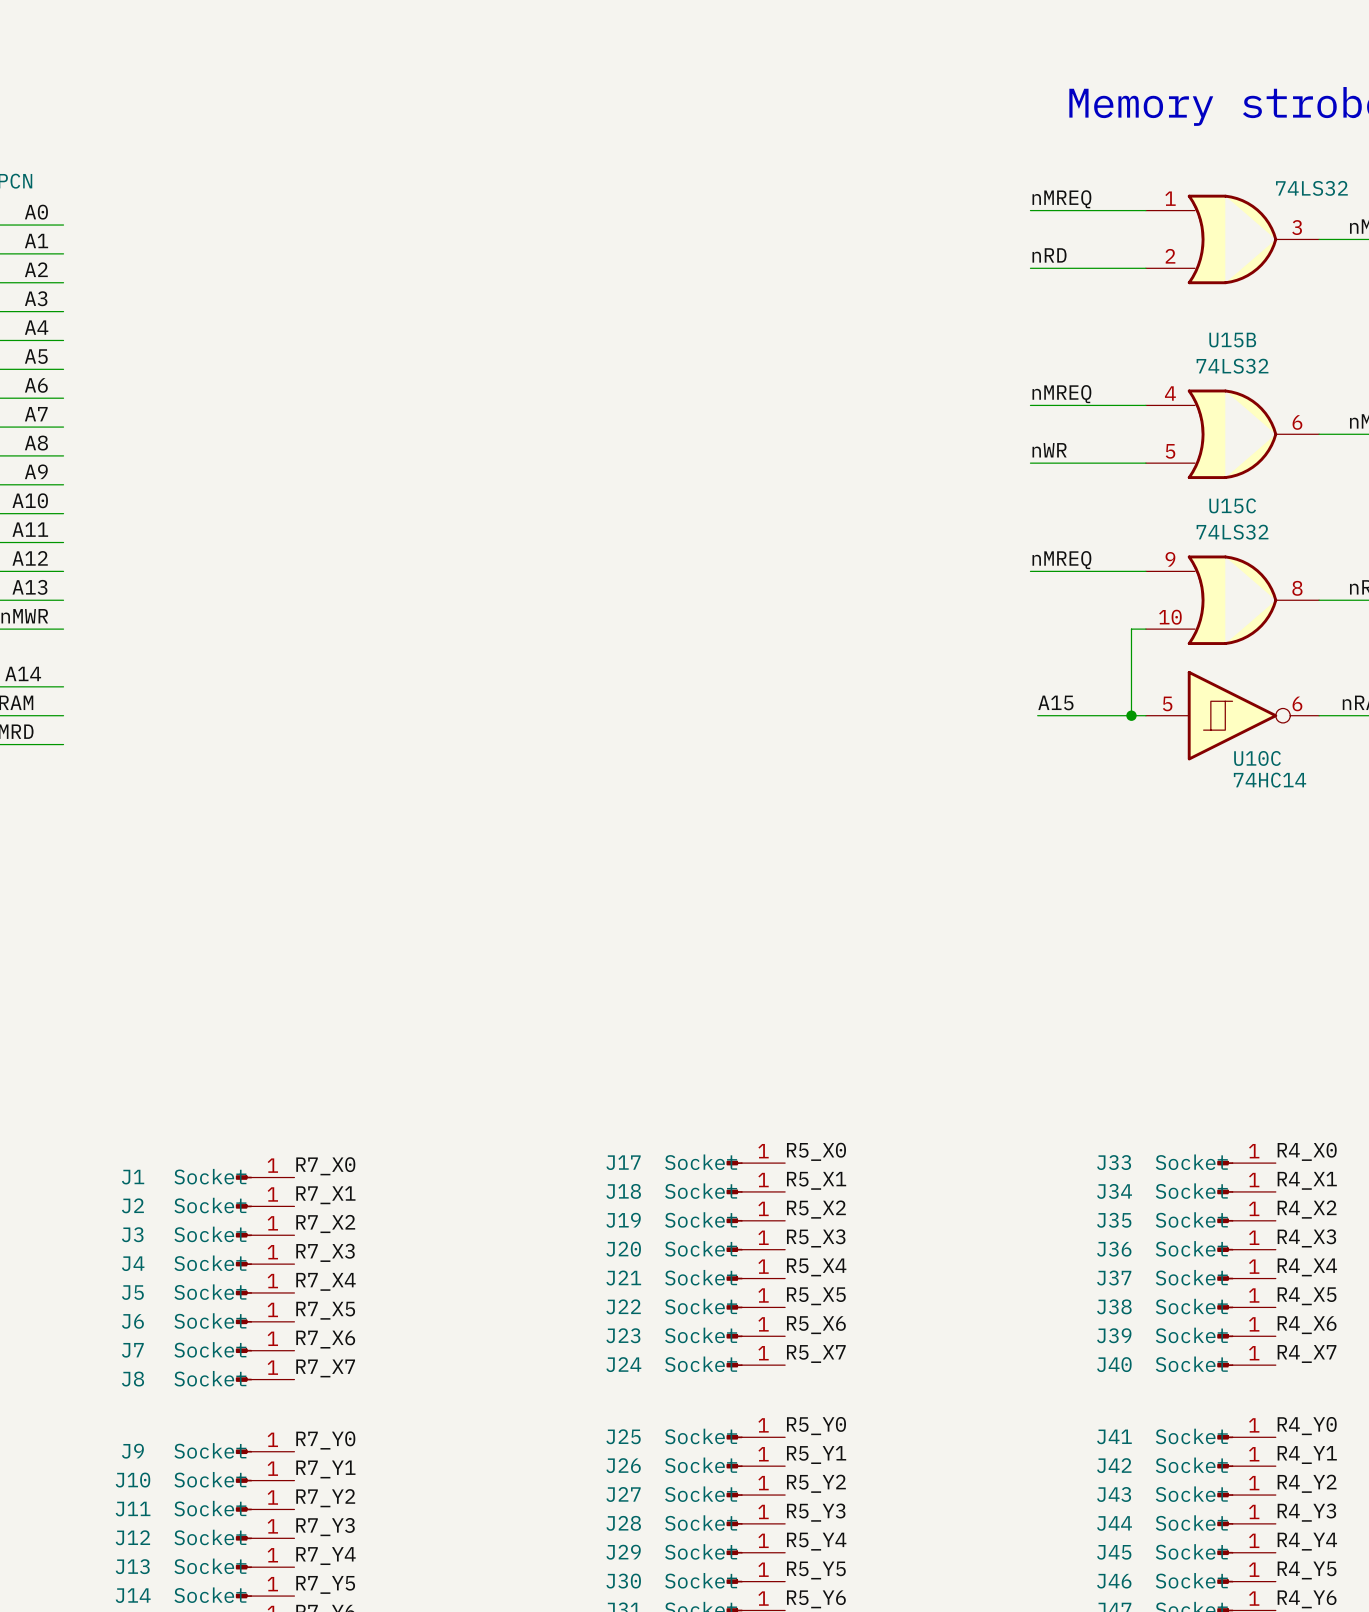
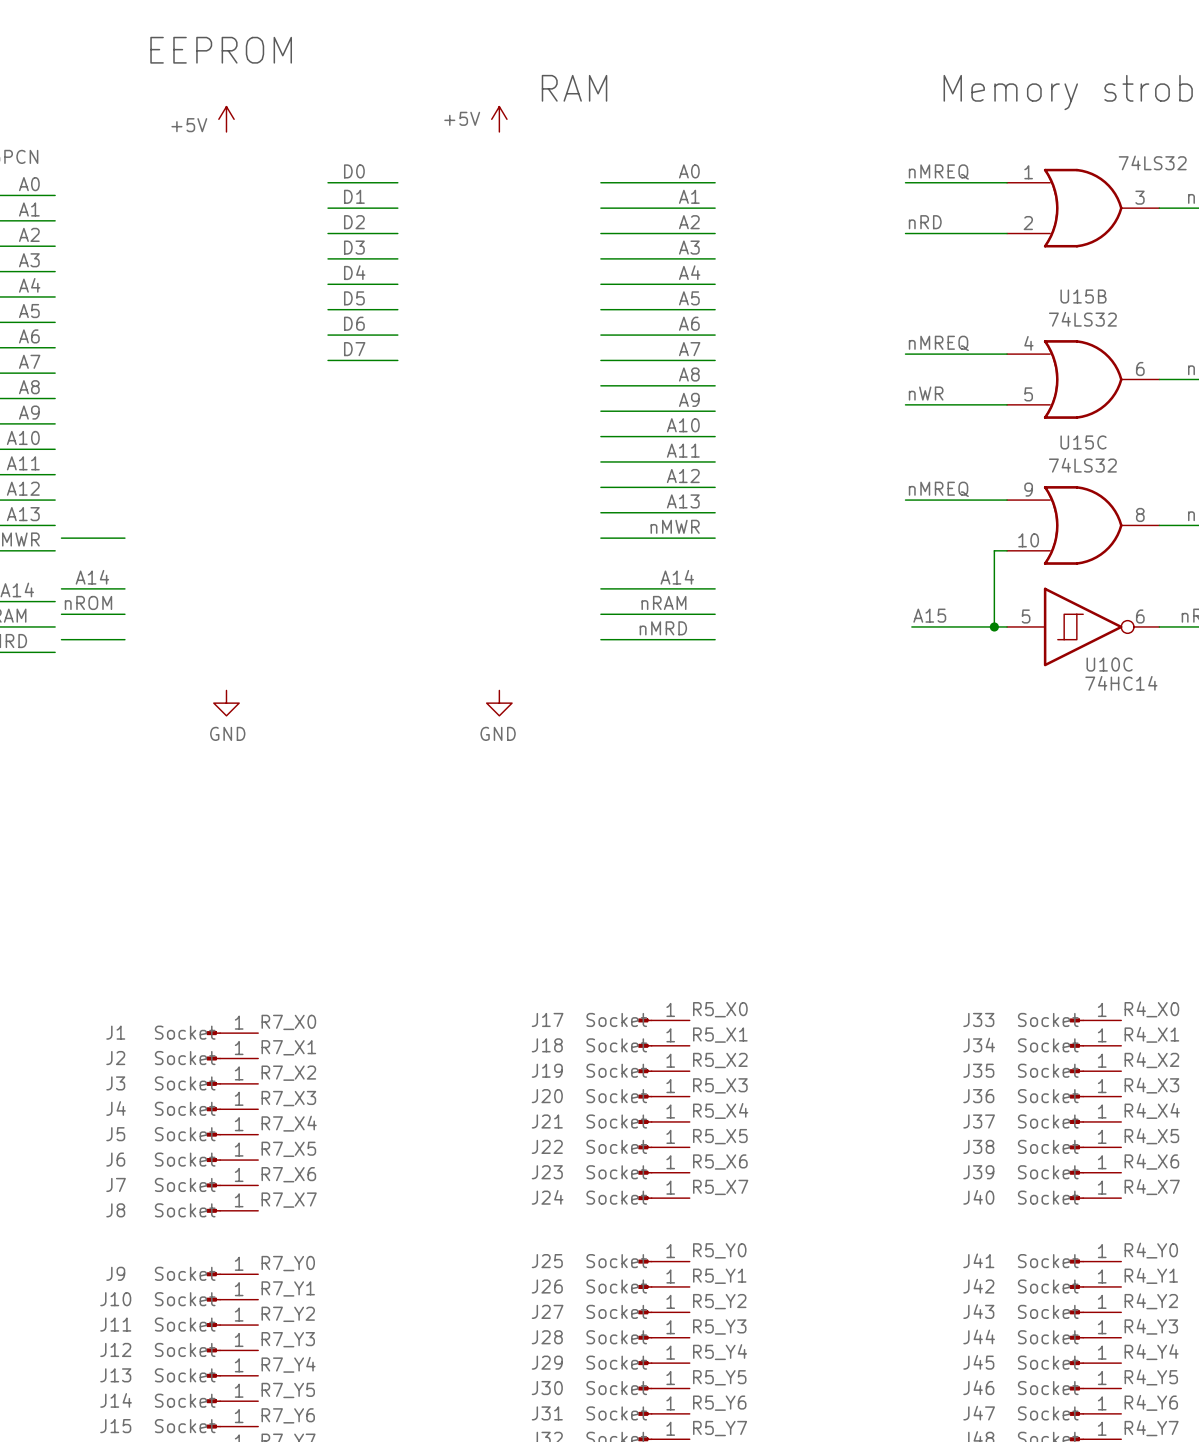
text: none -> EEPROM (221, 50)
text: none -> RAM (574, 88)
power symbol: none -> +5V (226, 119)
power symbol: none -> +5V (499, 119)
label: none -> D0 (354, 171)
label: none -> A0 (689, 171)
wire: none -> (328, 182) (397, 182)
wire: none -> (600, 182) (715, 182)
label: none -> D1 (354, 196)
label: none -> A1 (689, 196)
wire: none -> (328, 208) (397, 208)
wire: none -> (600, 208) (715, 208)
label: none -> D2 (354, 222)
label: none -> A2 (689, 222)
wire: none -> (328, 233) (397, 233)
wire: none -> (600, 233) (715, 233)
label: none -> D3 (354, 247)
label: none -> A3 (689, 247)
wire: none -> (328, 258) (397, 258)
wire: none -> (600, 258) (715, 258)
label: none -> D4 (354, 272)
label: none -> A4 (689, 272)
wire: none -> (328, 284) (397, 284)
wire: none -> (600, 284) (715, 284)
label: none -> D5 (354, 298)
label: none -> A5 (689, 298)
wire: none -> (328, 309) (397, 309)
wire: none -> (600, 309) (715, 309)
label: none -> D6 (354, 323)
label: none -> A6 (689, 323)
wire: none -> (328, 335) (397, 335)
wire: none -> (600, 335) (715, 335)
label: none -> D7 (354, 349)
label: none -> A7 (689, 349)
wire: none -> (328, 360) (397, 360)
wire: none -> (600, 360) (715, 360)
label: none -> A8 (689, 374)
wire: none -> (600, 385) (715, 385)
label: none -> A9 (689, 399)
wire: none -> (600, 411) (715, 411)
label: none -> A10 (683, 425)
wire: none -> (600, 436) (715, 436)
label: none -> A11 (683, 450)
wire: none -> (600, 461) (715, 461)
label: none -> A12 (683, 476)
wire: none -> (600, 487) (715, 487)
label: none -> A13 (683, 501)
wire: none -> (600, 512) (715, 512)
label: none -> nMWR (675, 526)
wire: none -> (61, 538) (124, 538)
wire: none -> (600, 538) (715, 538)
label: none -> A14 (92, 577)
label: none -> A14 (677, 577)
wire: none -> (61, 588) (124, 588)
wire: none -> (600, 588) (715, 588)
label: none -> nROM (88, 602)
label: none -> nRAM (663, 602)
wire: none -> (61, 614) (124, 614)
wire: none -> (600, 614) (715, 614)
label: none -> nMRD (663, 628)
wire: none -> (61, 639) (124, 639)
wire: none -> (600, 639) (715, 639)
power symbol: none -> GND (226, 703)
power symbol: none -> GND (499, 703)

